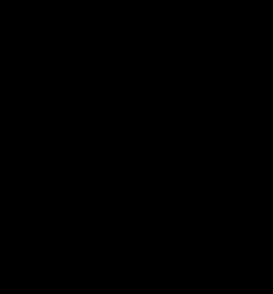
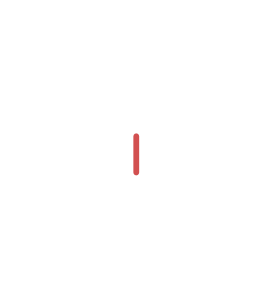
track: none -> (136, 136) (136, 172)

